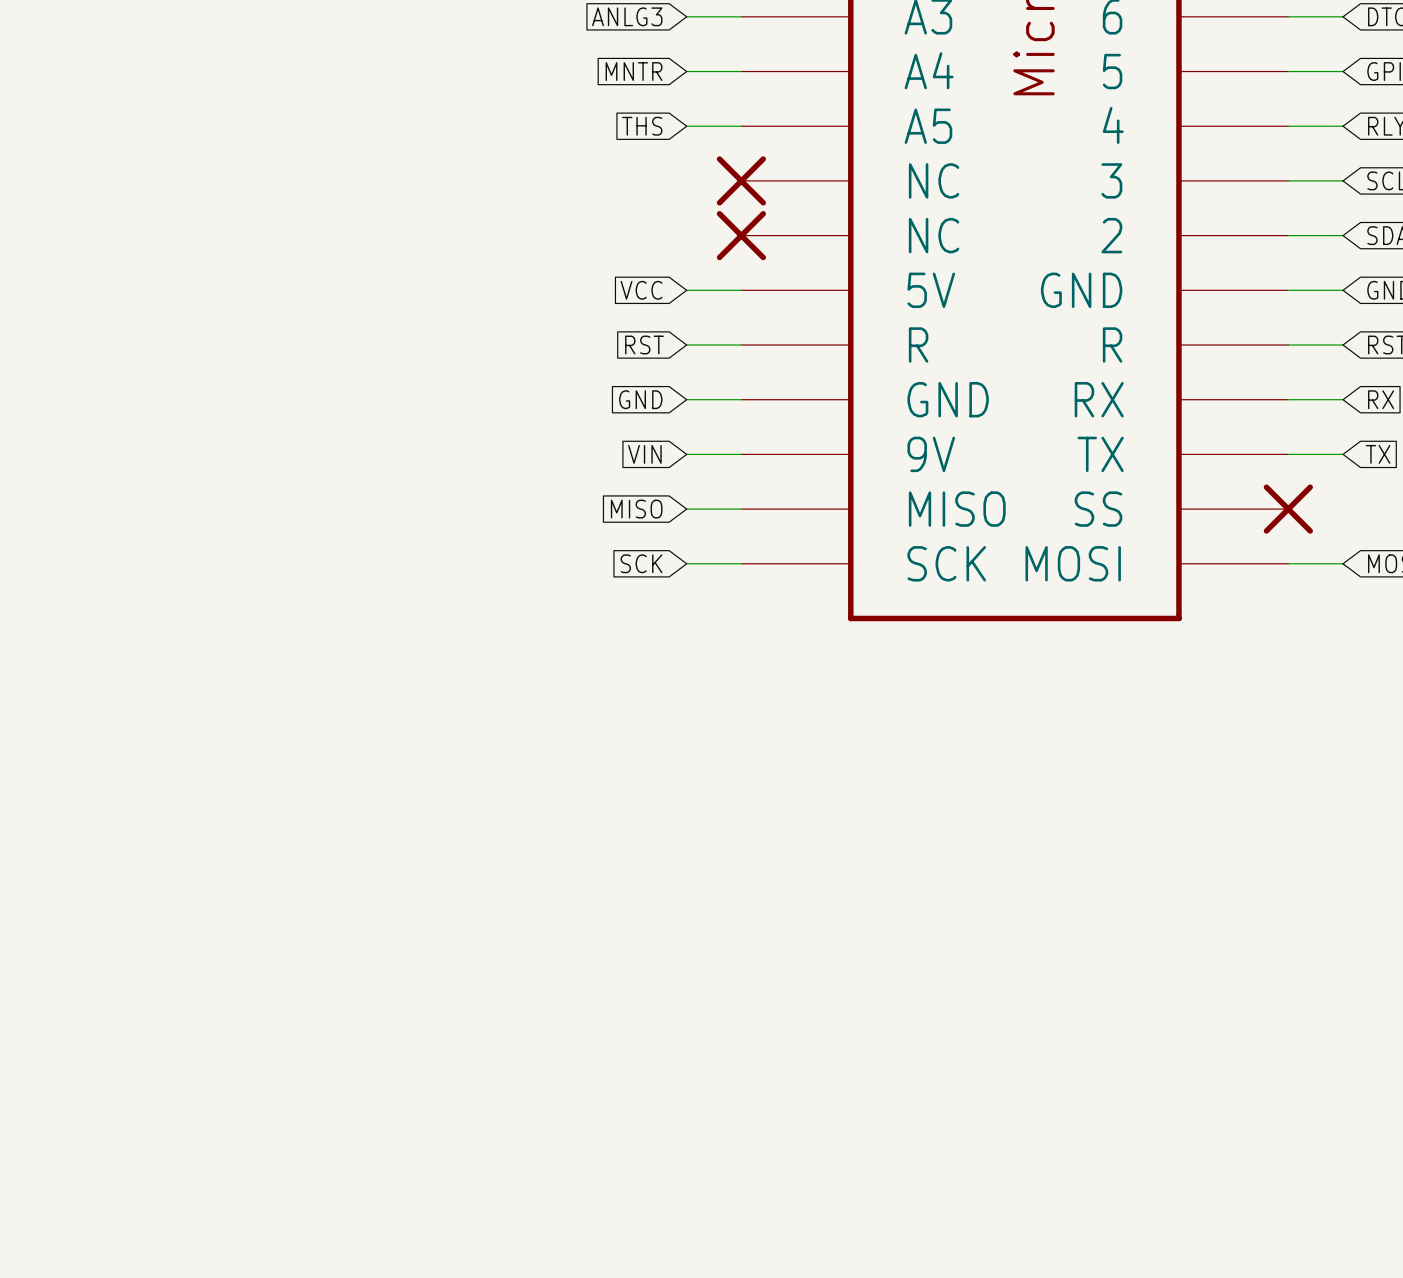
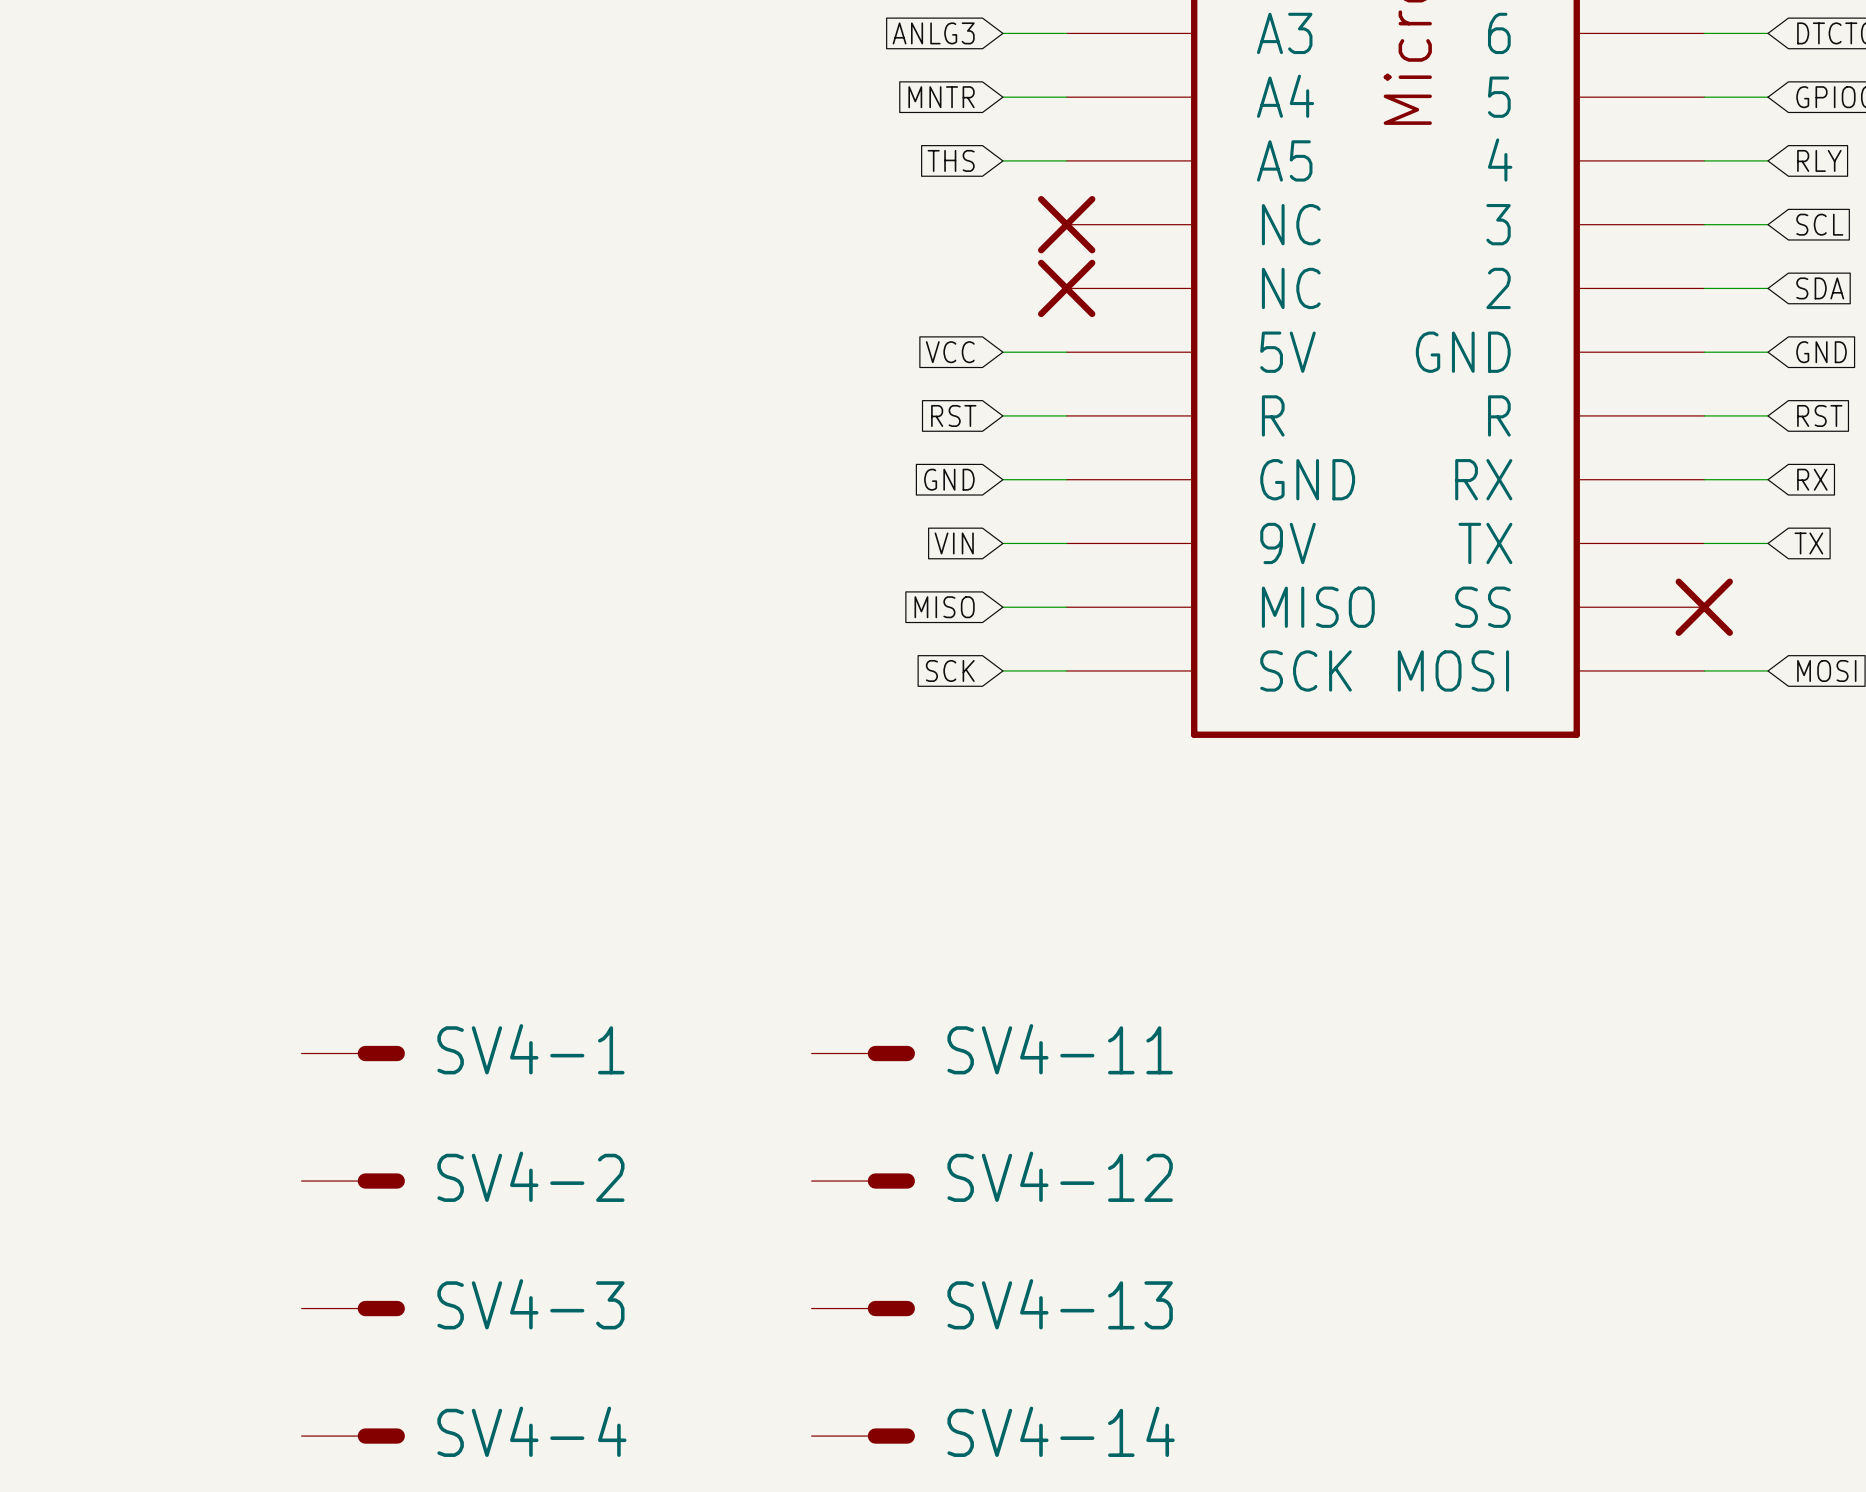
SV4-1: none -> (353, 1053)
SV4-11: none -> (863, 1053)
SV4-2: none -> (353, 1181)
SV4-12: none -> (863, 1181)
SV4-3: none -> (353, 1308)
SV4-13: none -> (863, 1308)
SV4-4: none -> (353, 1436)
SV4-14: none -> (863, 1436)

